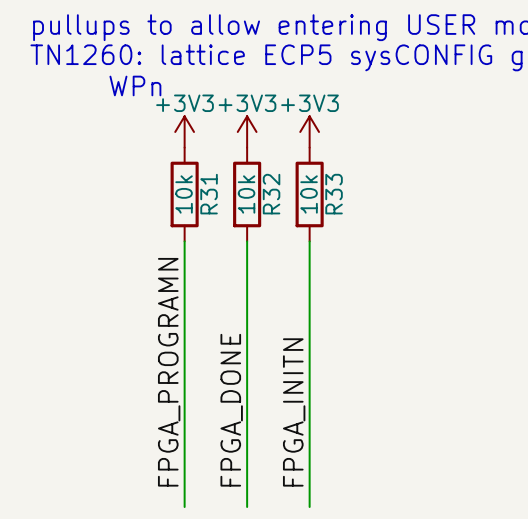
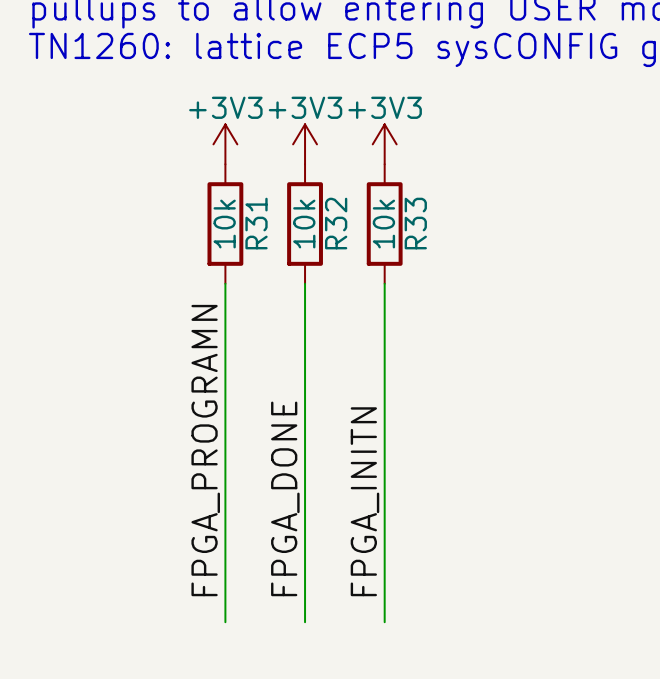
text: WPn (135, 85) -> none

